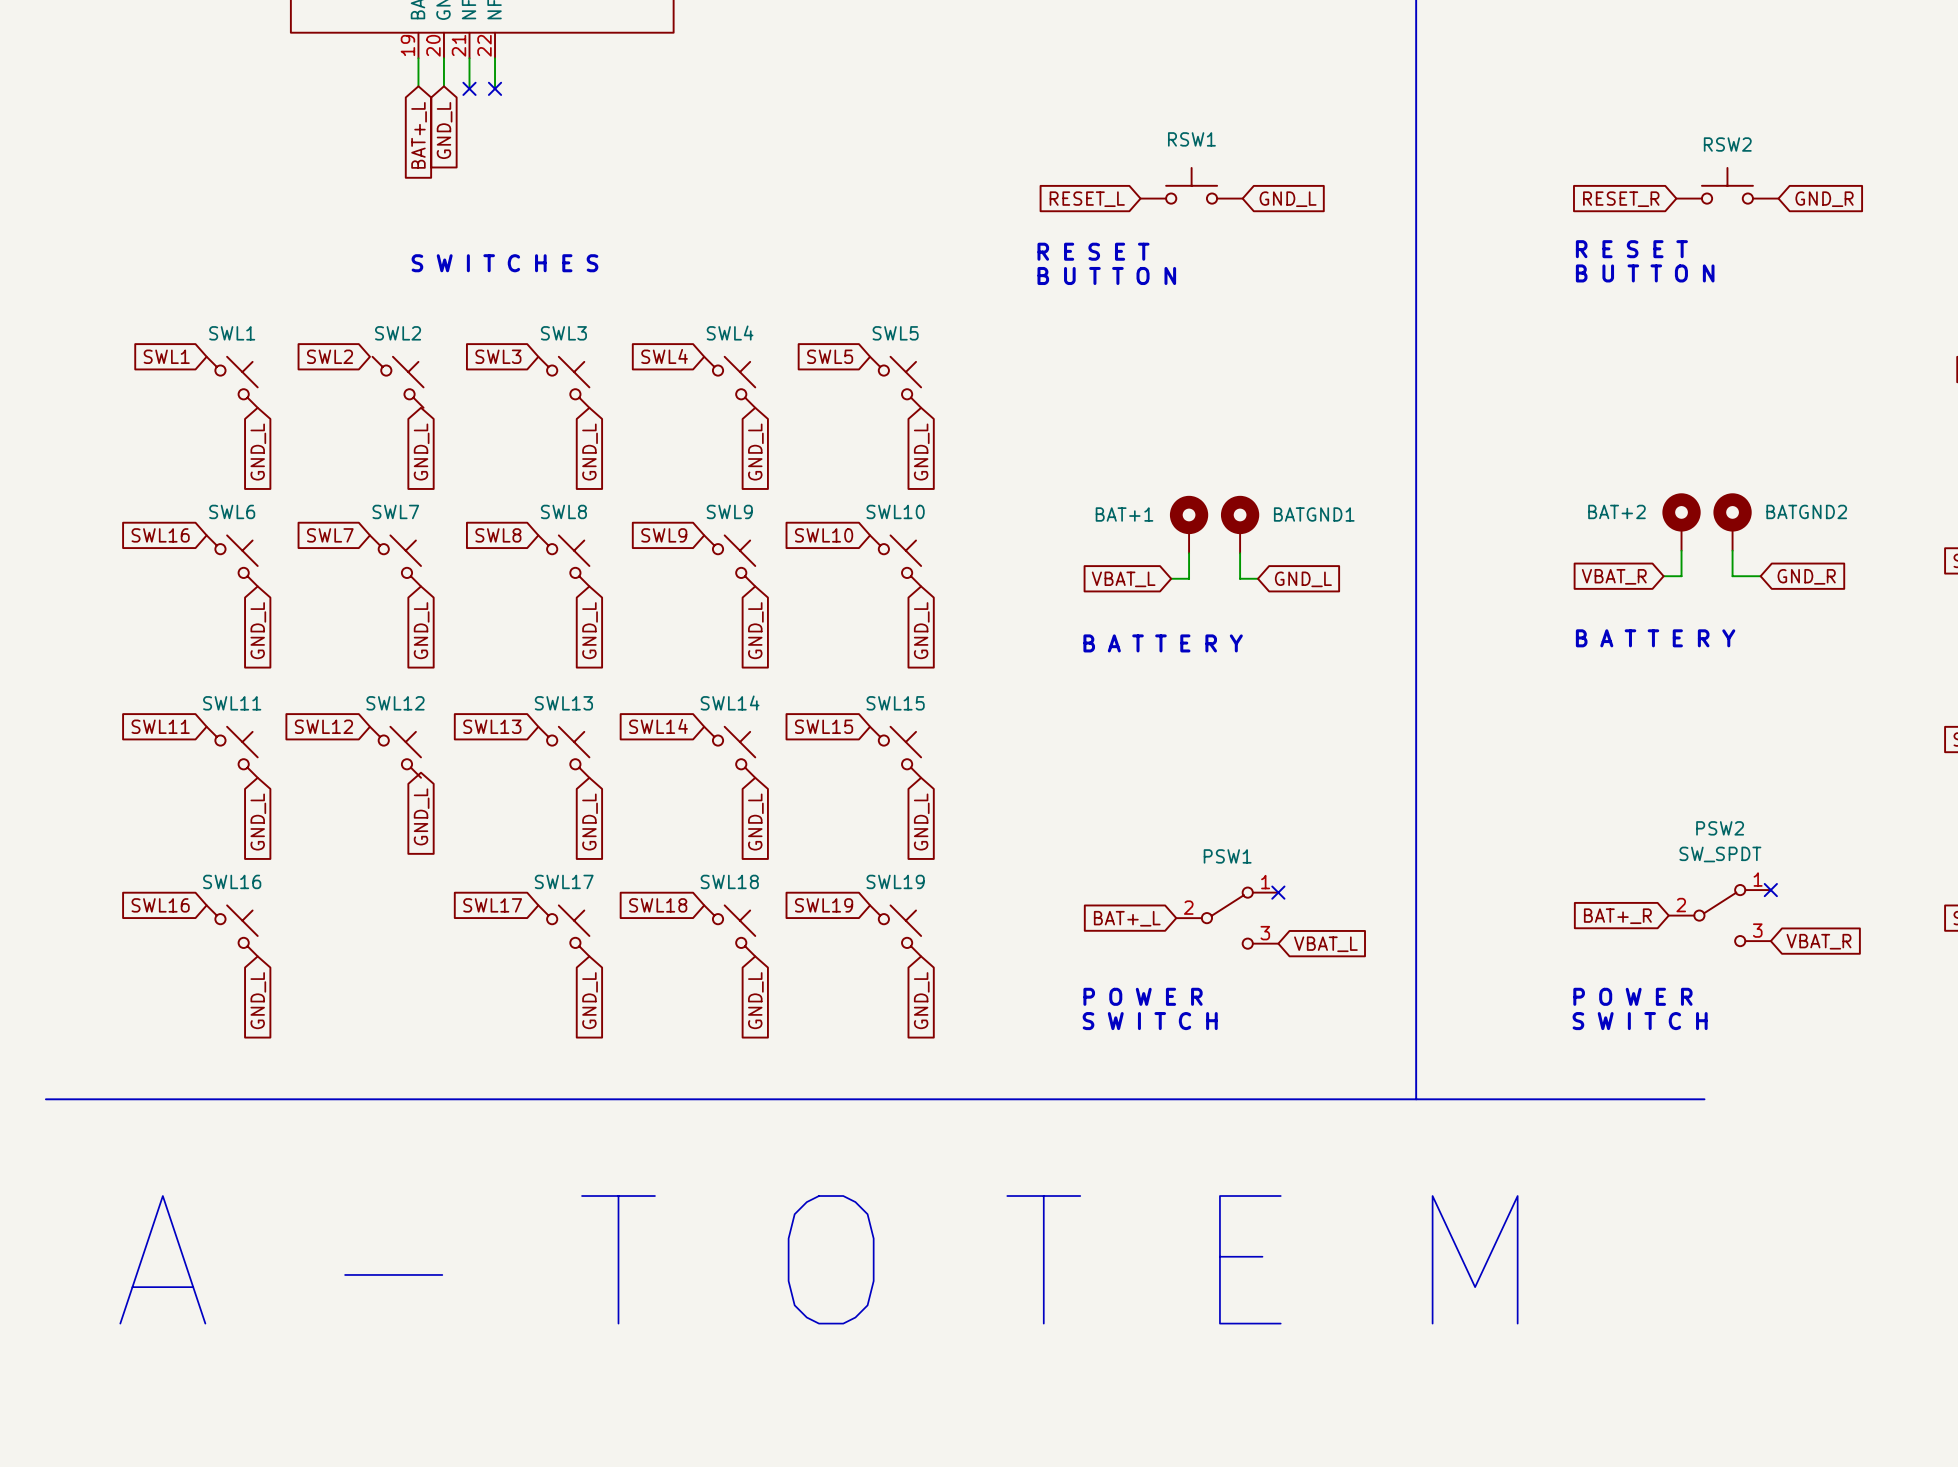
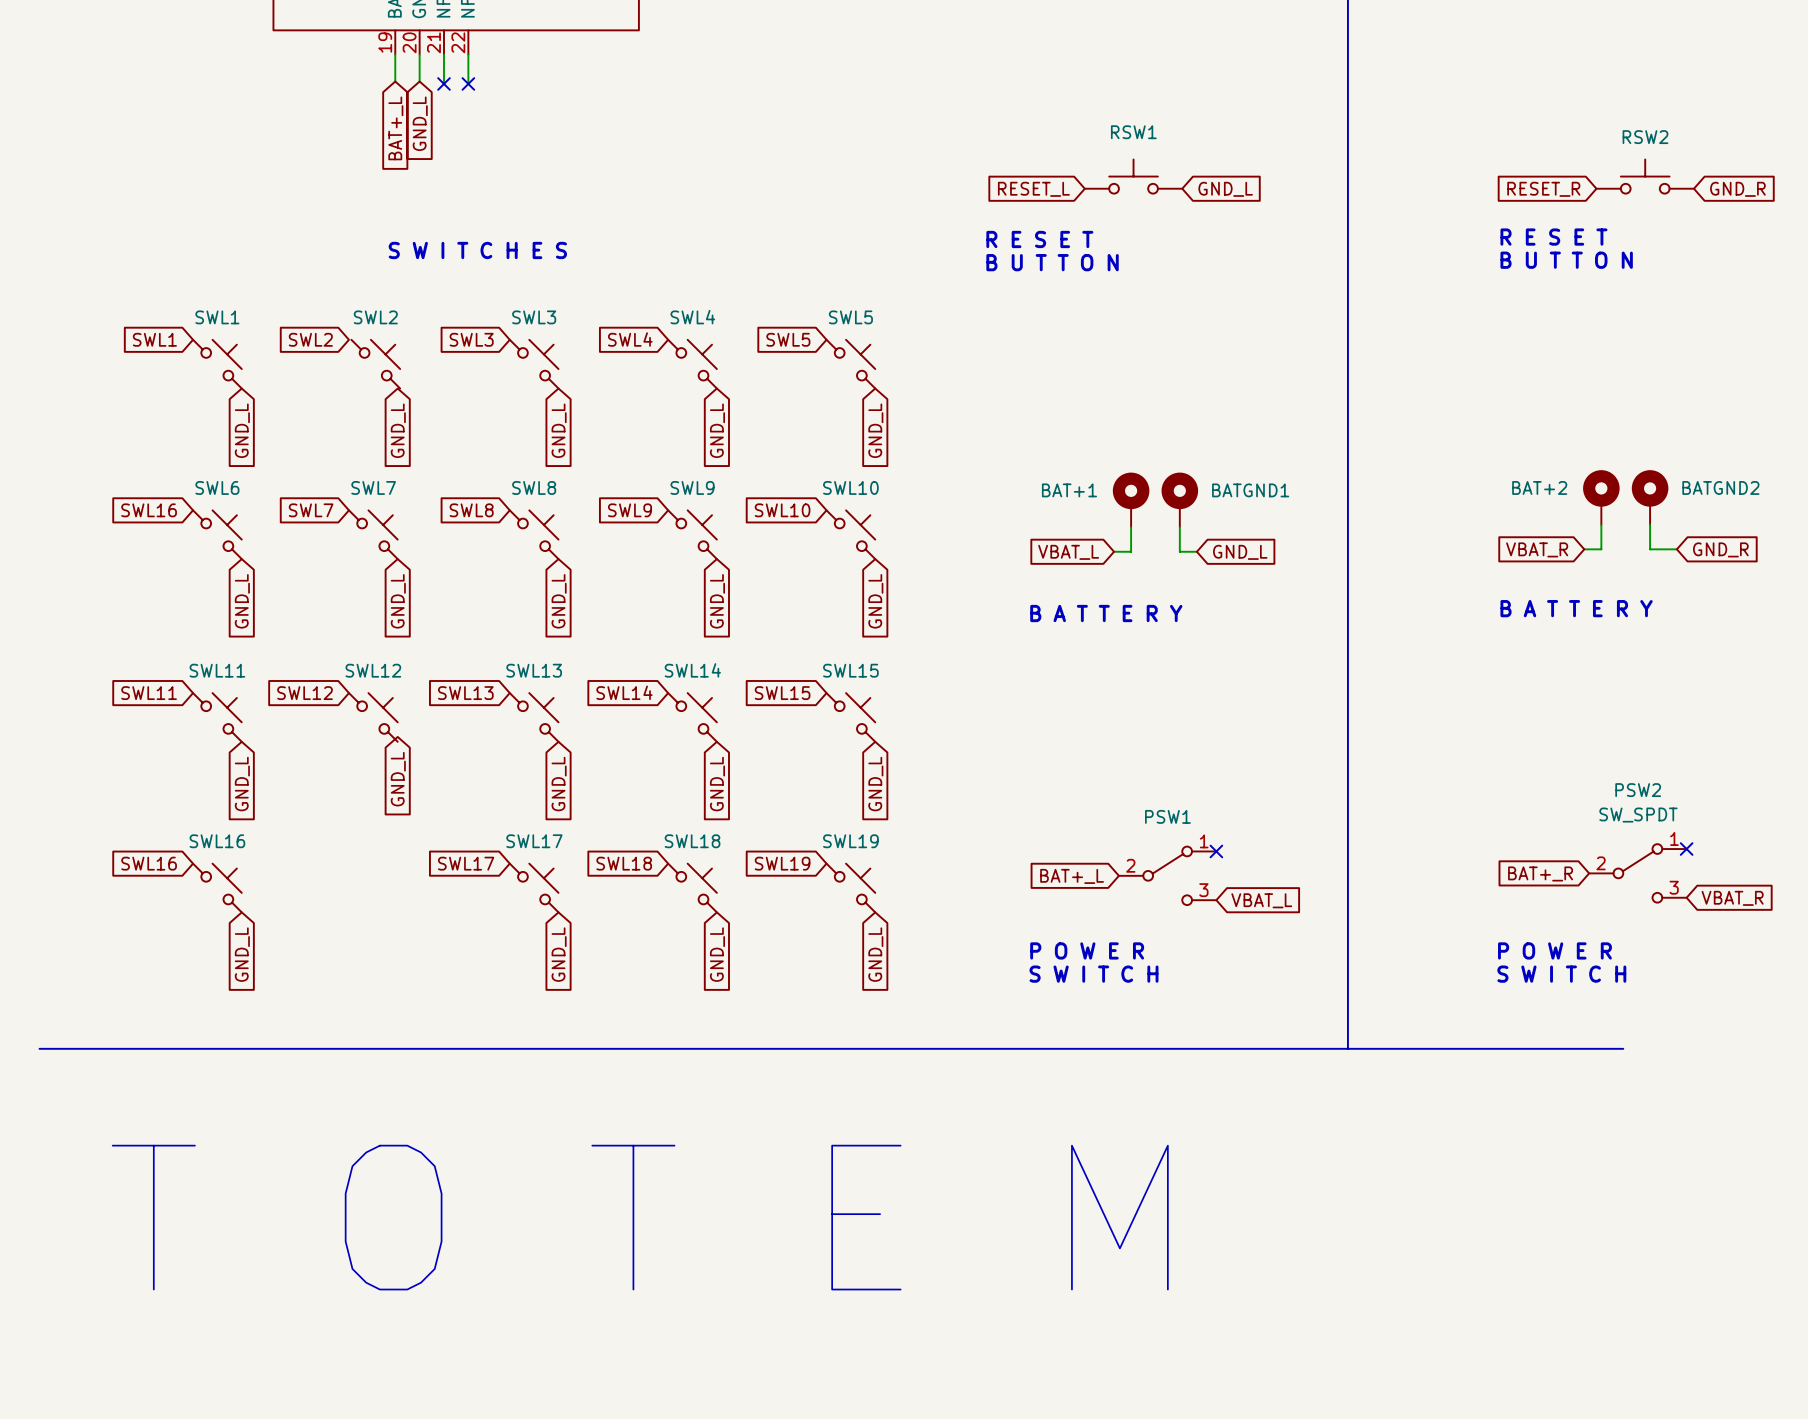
text: A - T O T E M (818, 1259) -> T O T E M (640, 1217)

